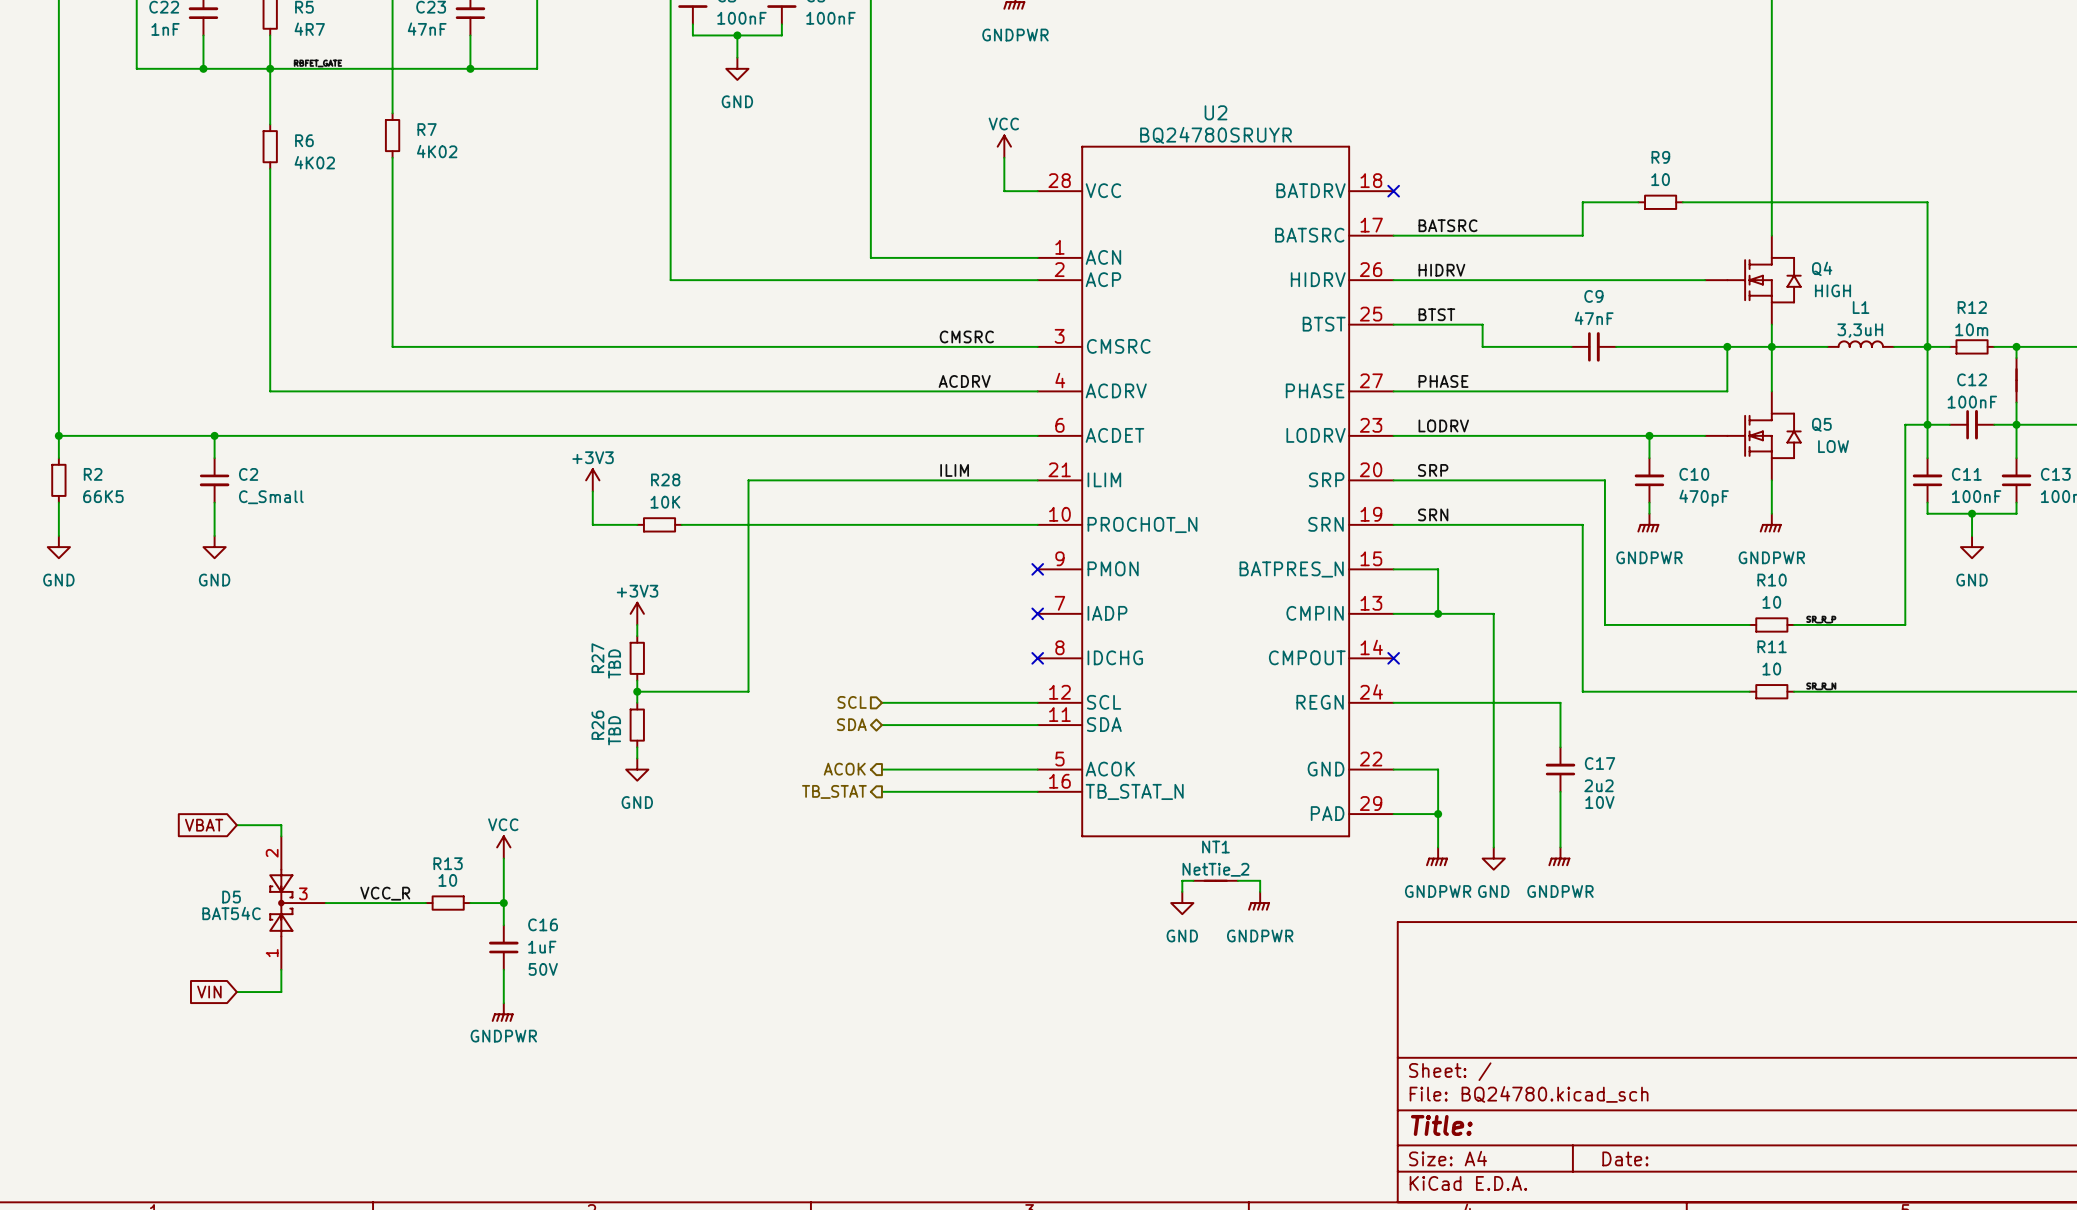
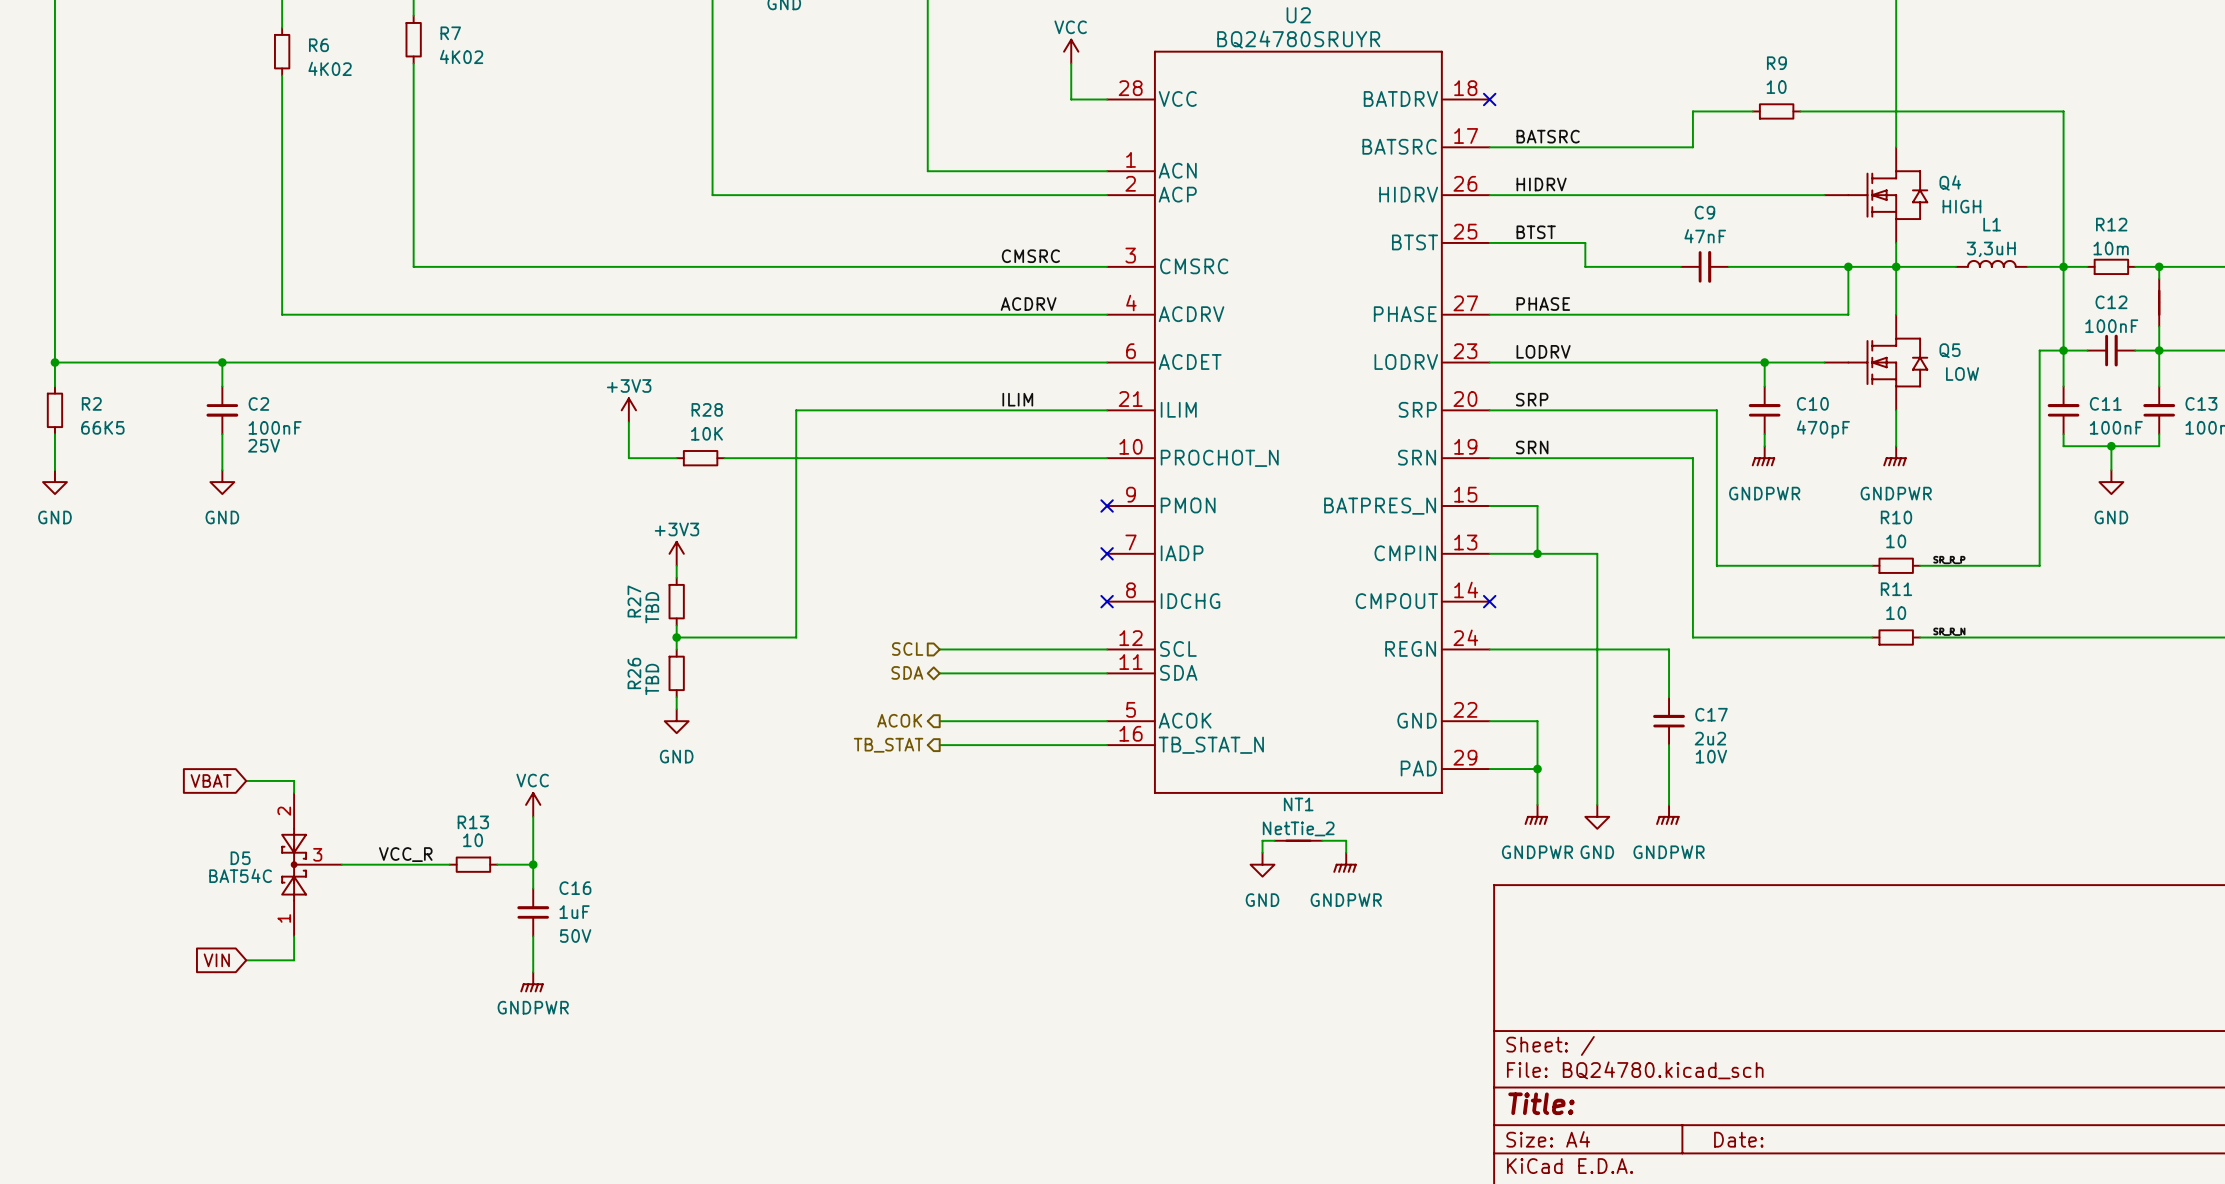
C2 value: C_Small (271, 497) -> 100nF (275, 427)
C2 text: none -> 25V (264, 445)

